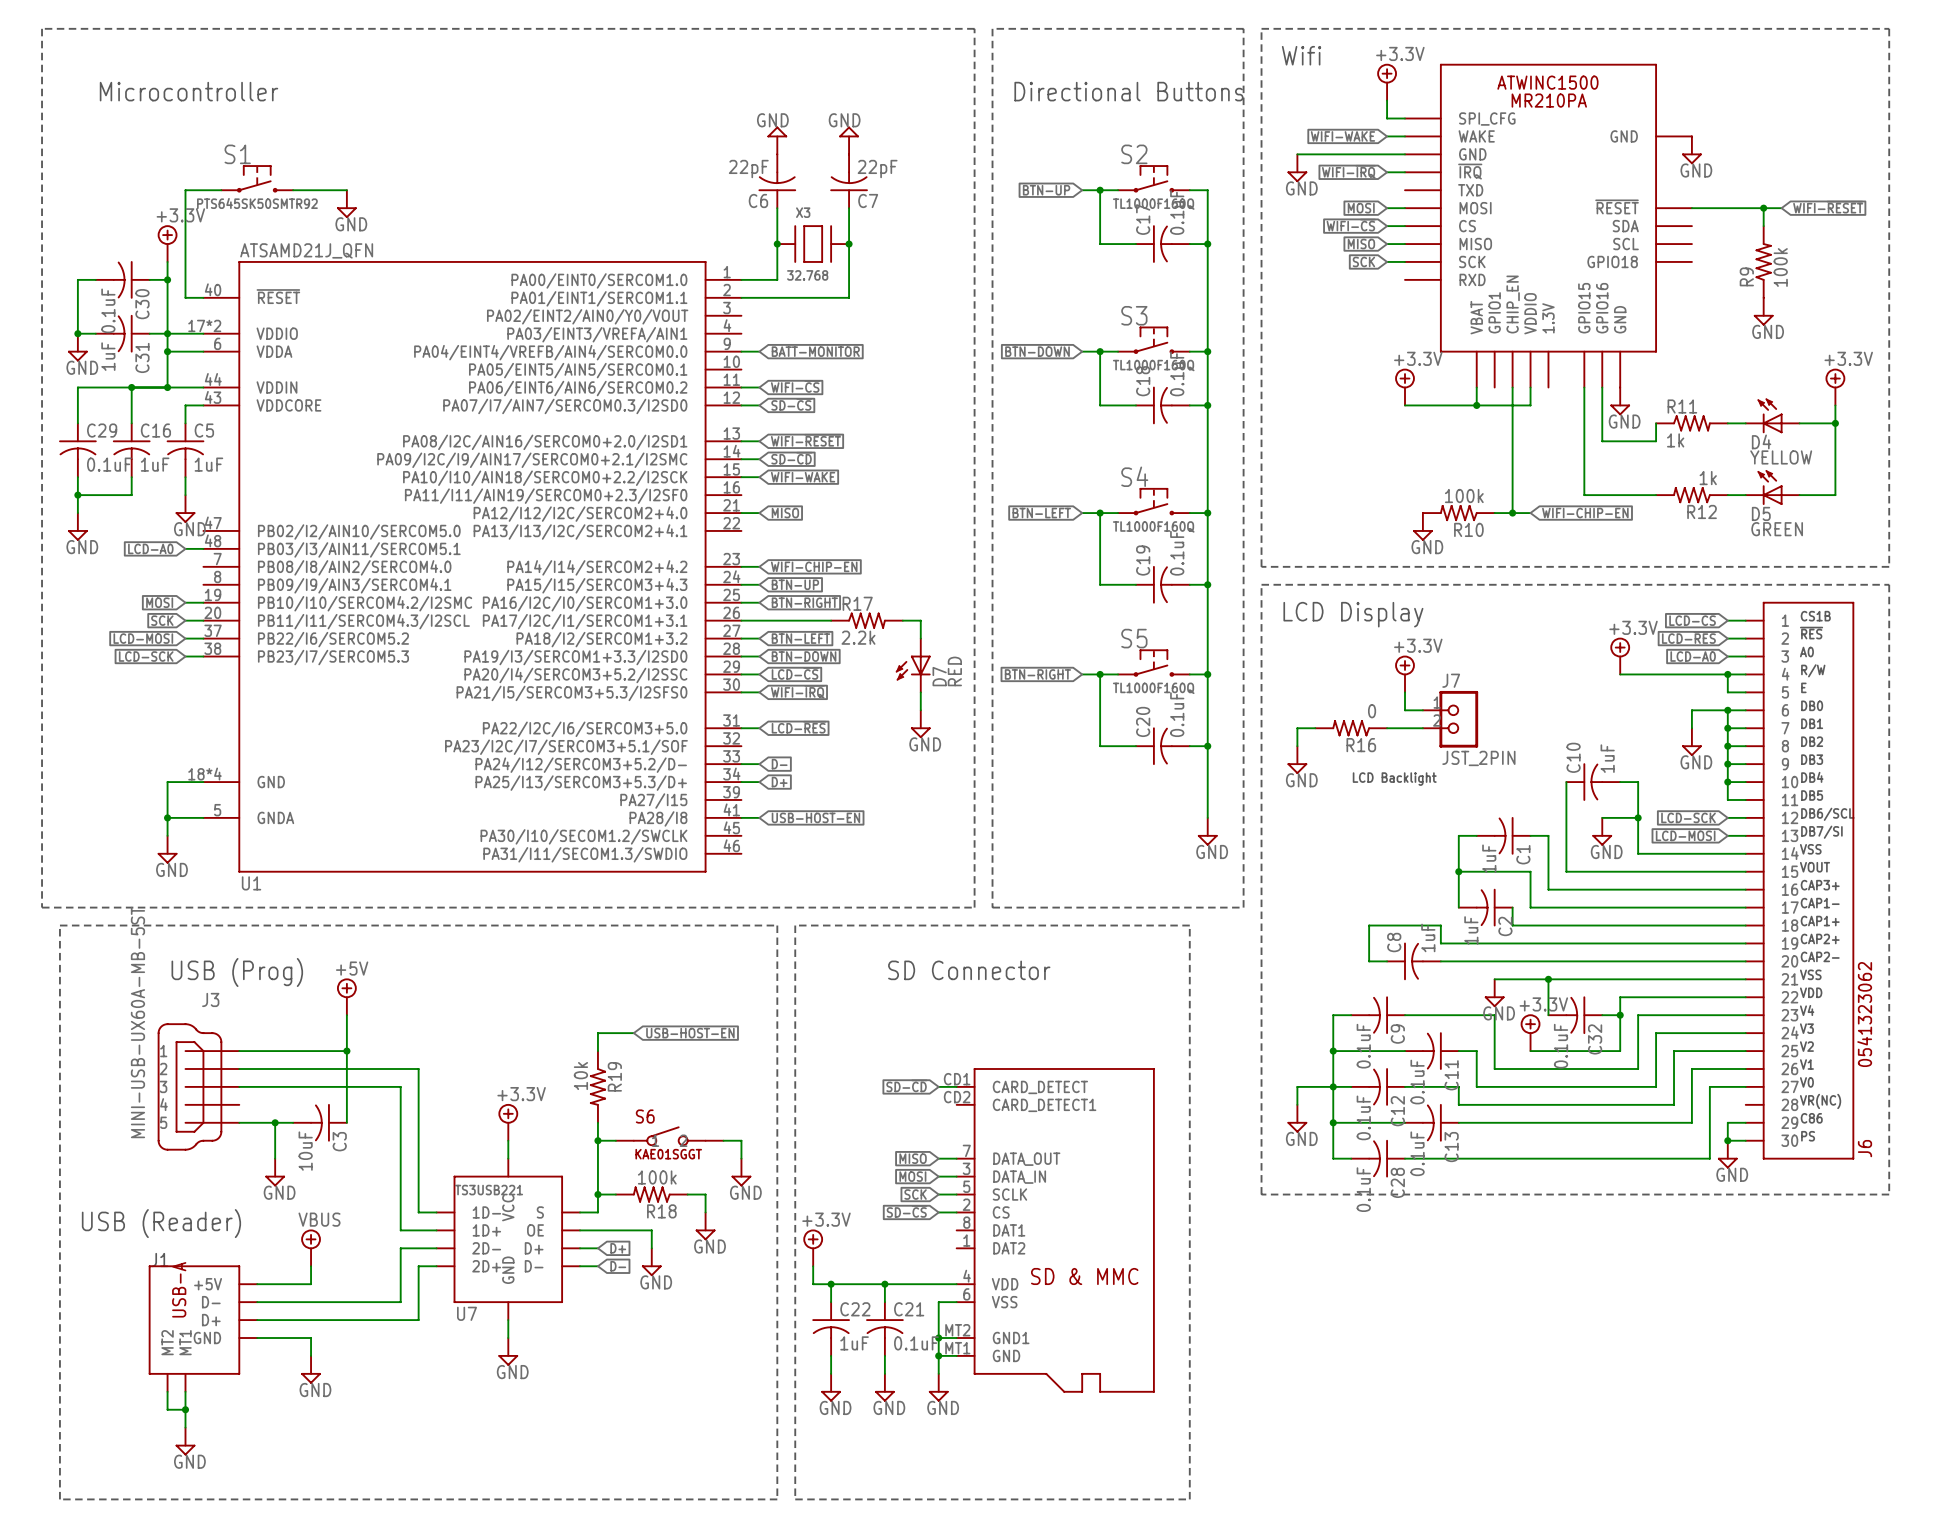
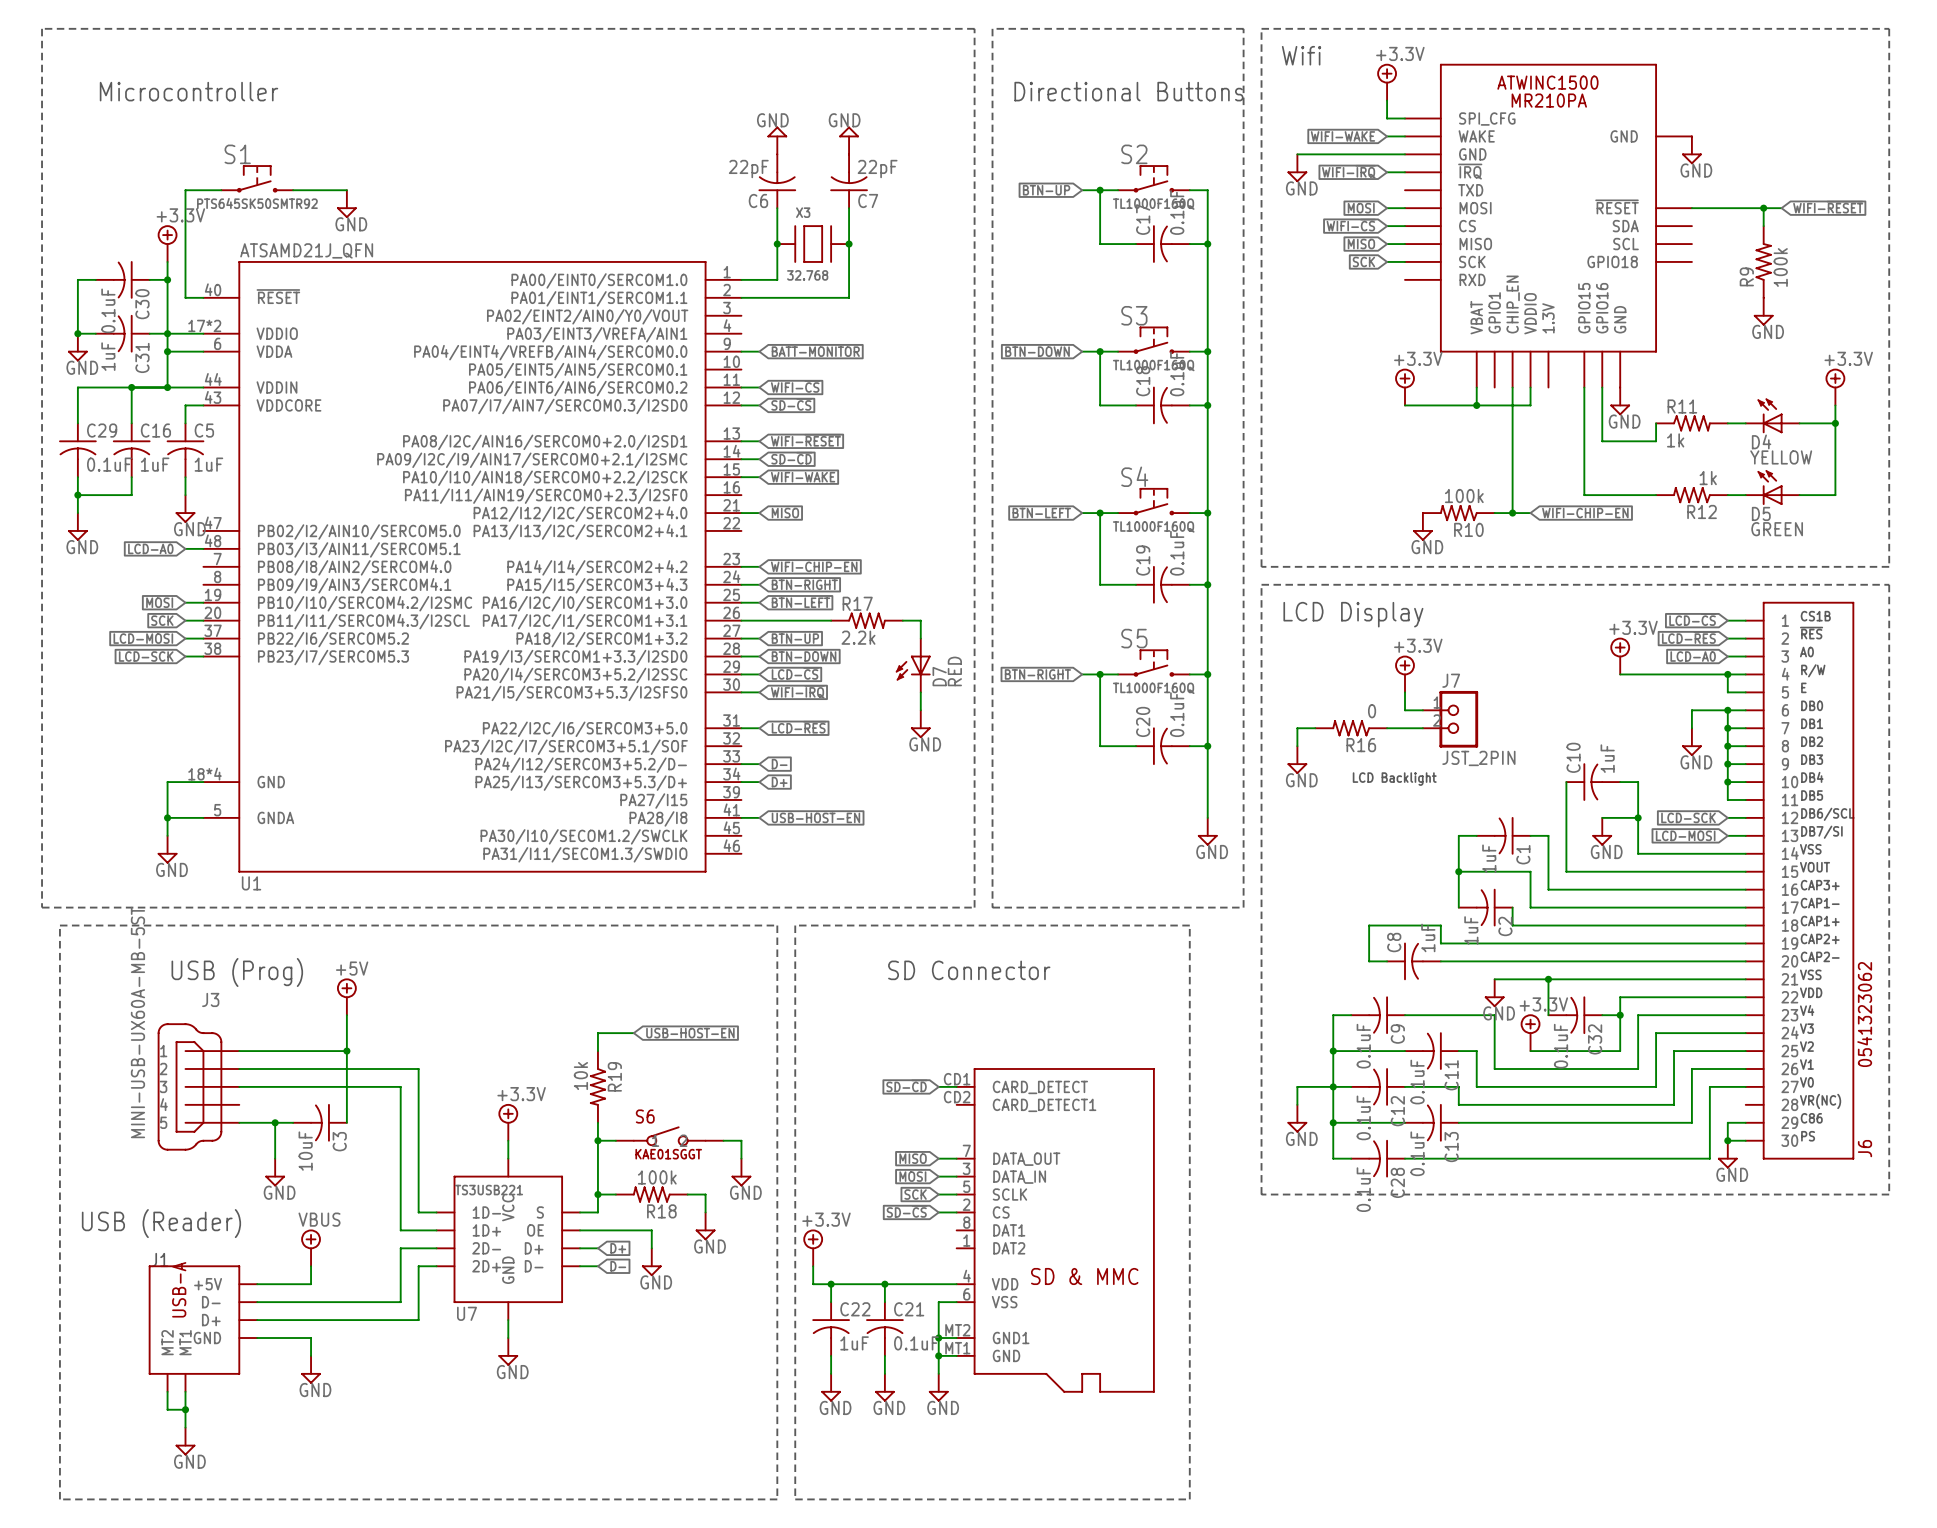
global label: BTN-UP (795, 584) -> BTN-RIGHT (804, 584)
global label: BTN-RIGHT (804, 602) -> BTN-LEFT (800, 602)
global label: BTN-LEFT (800, 638) -> BTN-UP (795, 638)

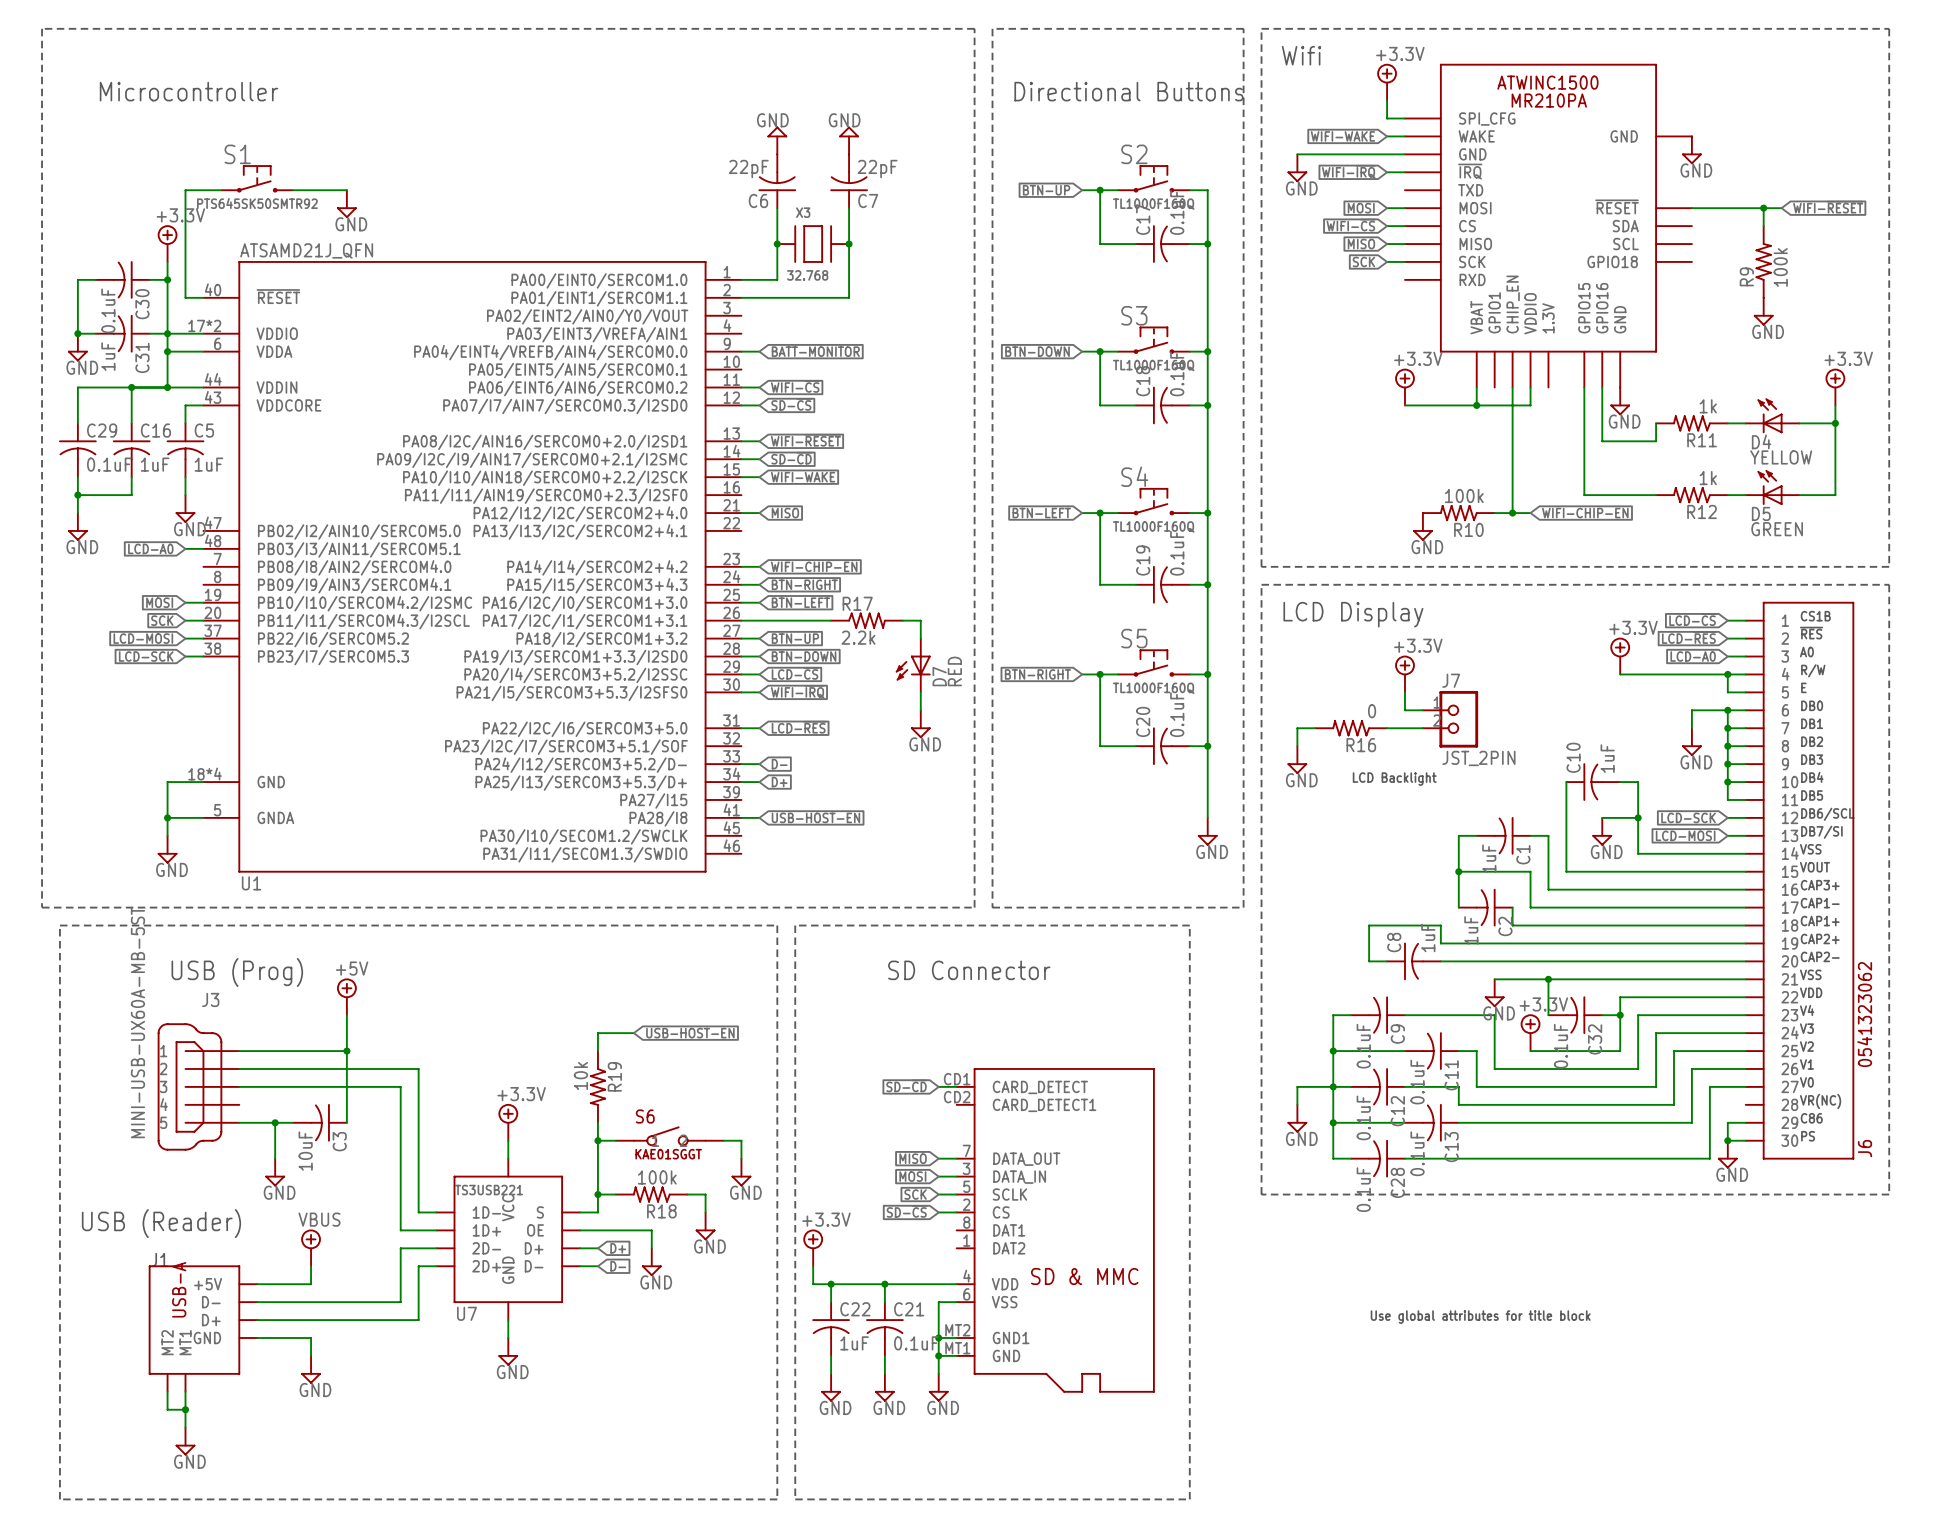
R11 rotation: 0° (1691, 423) -> 180° (1691, 423)
text: none -> Use global attributes for title block (1480, 1317)

